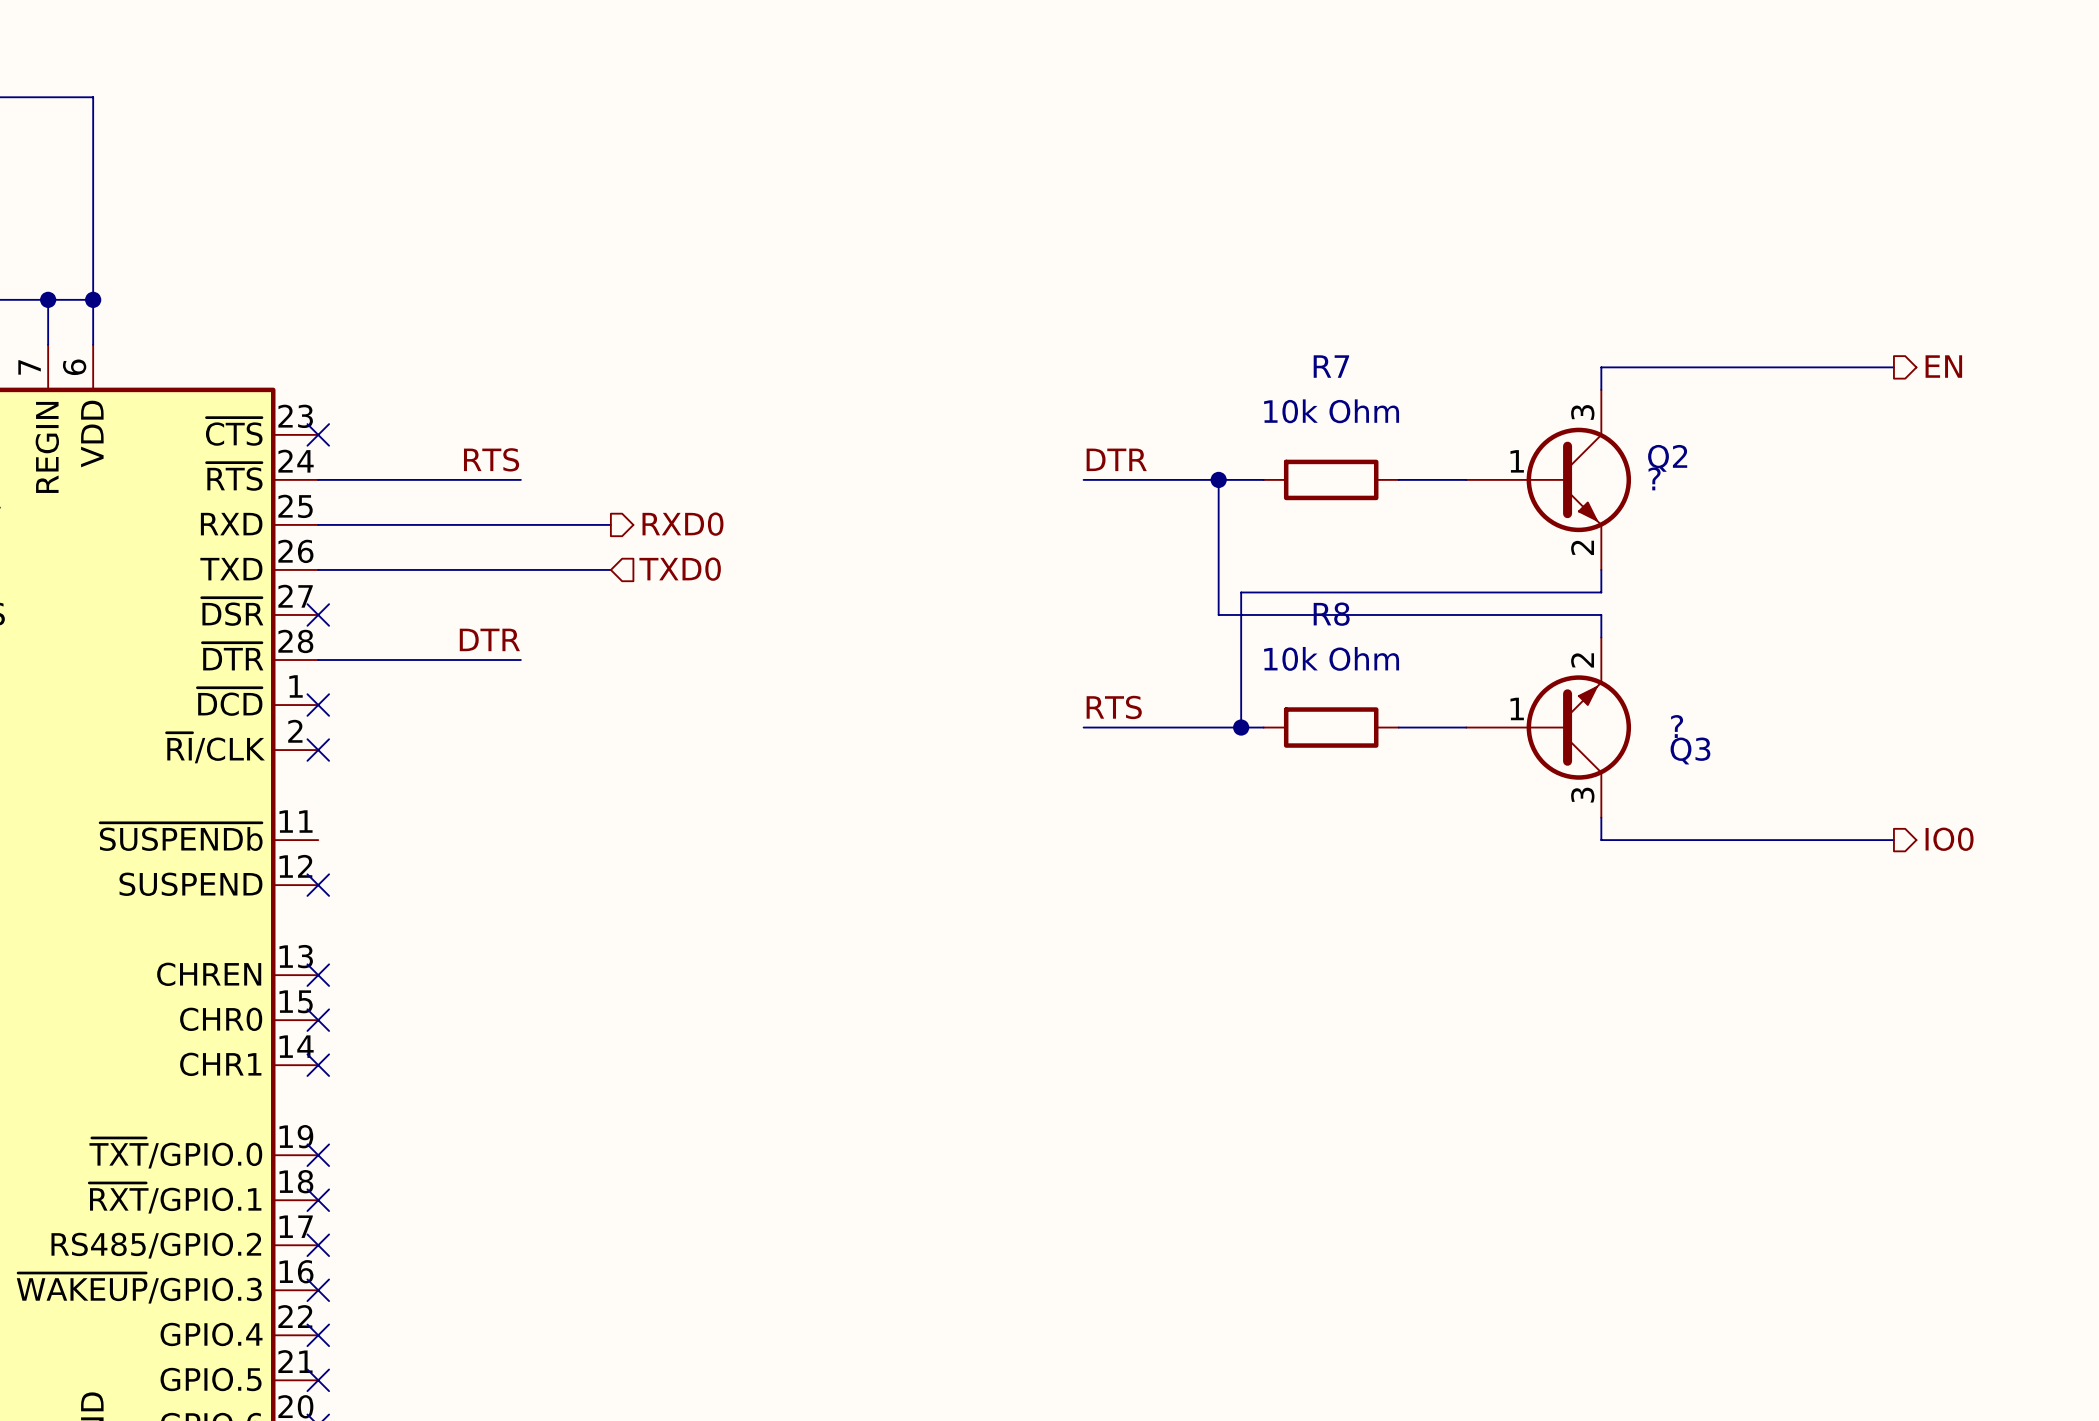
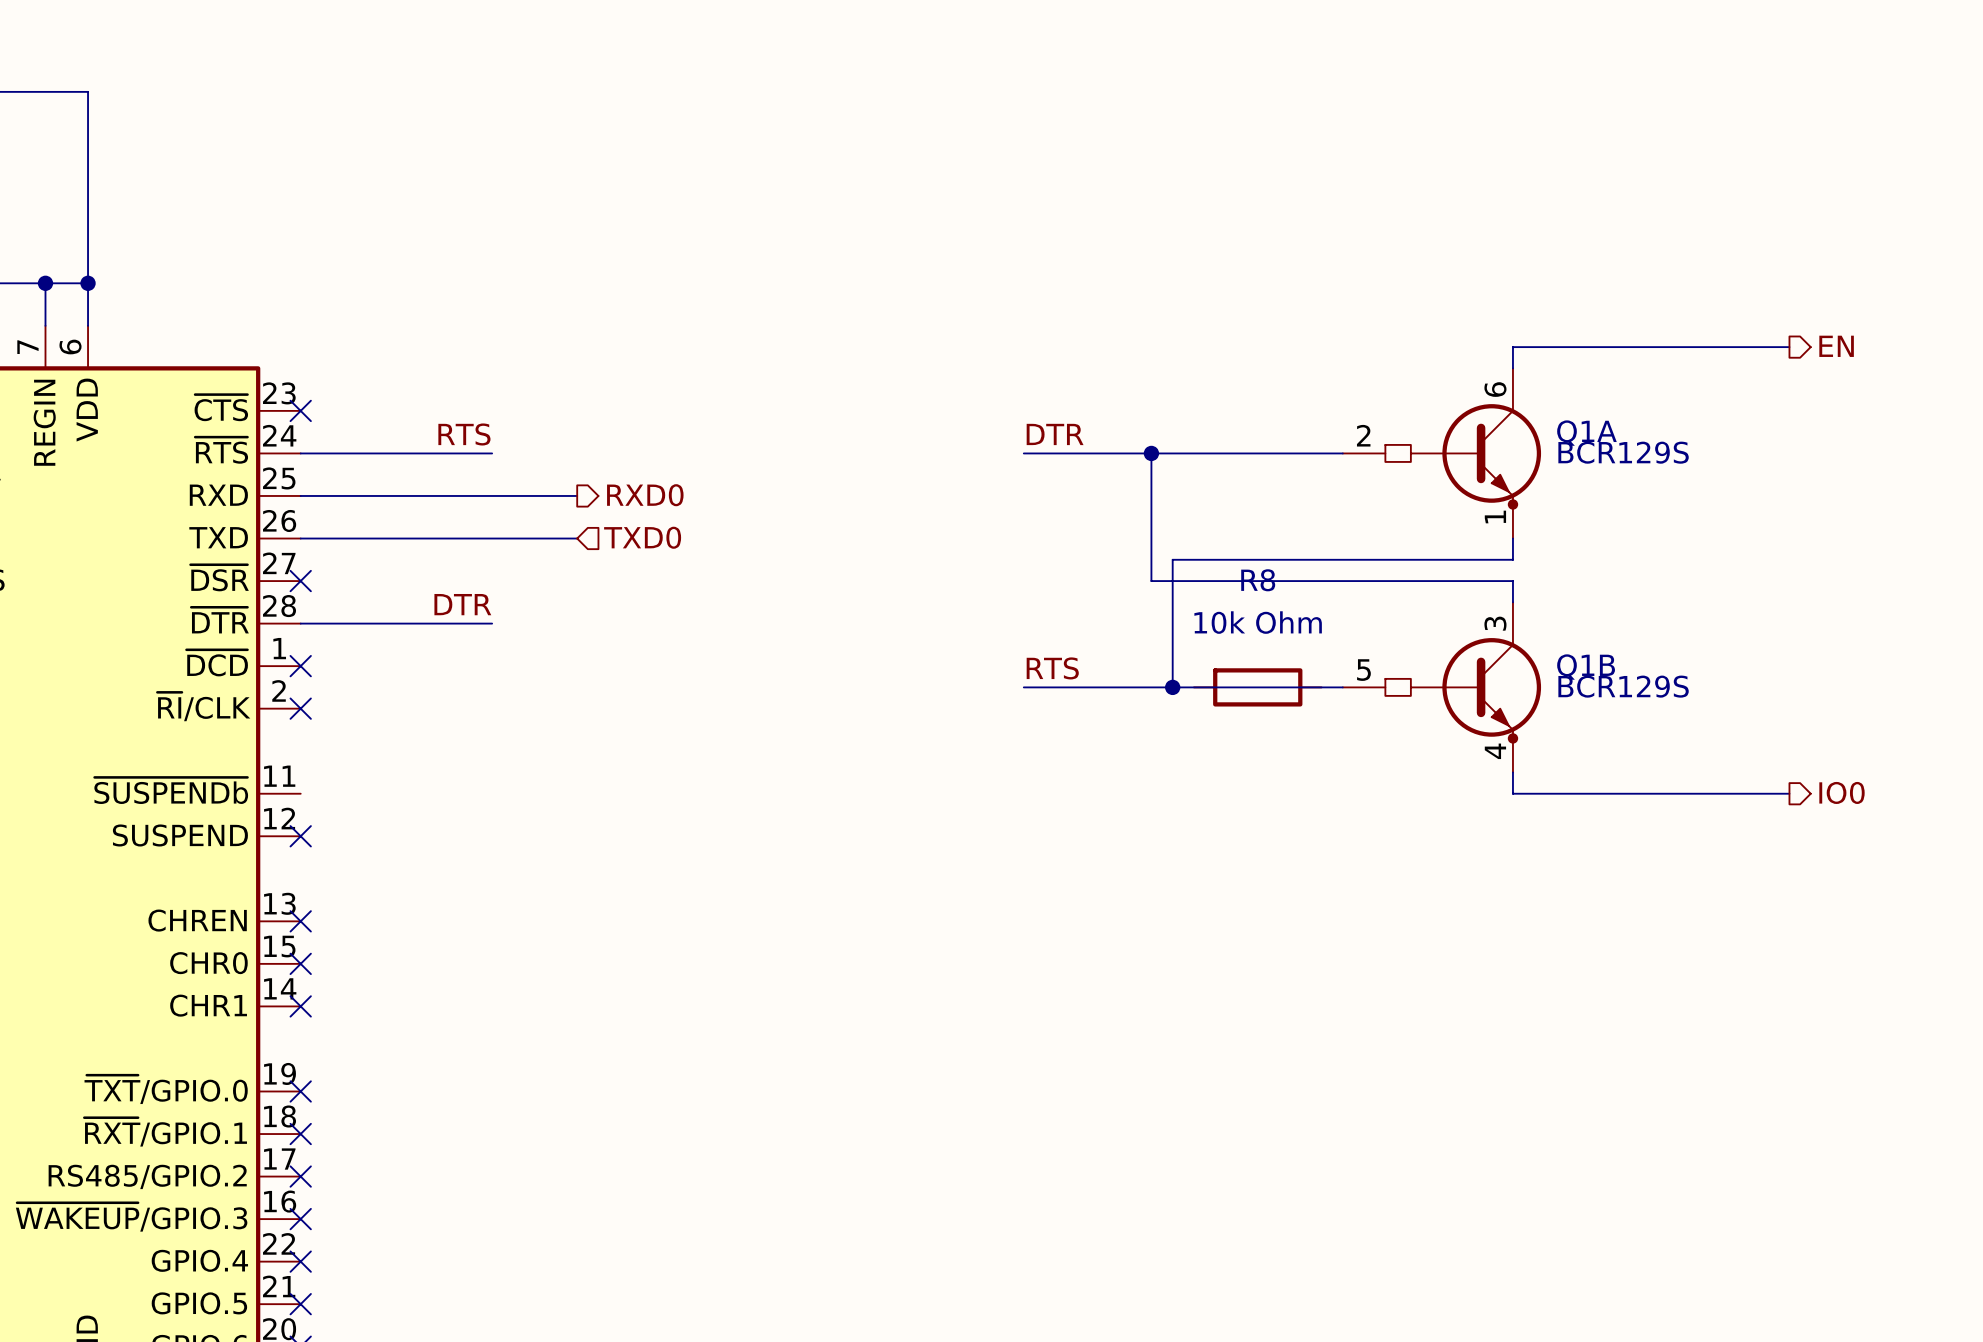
wire: none -> (1193, 453) (1321, 453)
R7: 10k Ohm (1331, 479) -> none
Q1A: none -> BCR129S (1441, 453)
Q2: ? (1548, 479) -> none
wire: none -> (1193, 687) (1321, 687)
Q1B: none -> BCR129S (1441, 687)
Q3: ? (1548, 727) -> none

